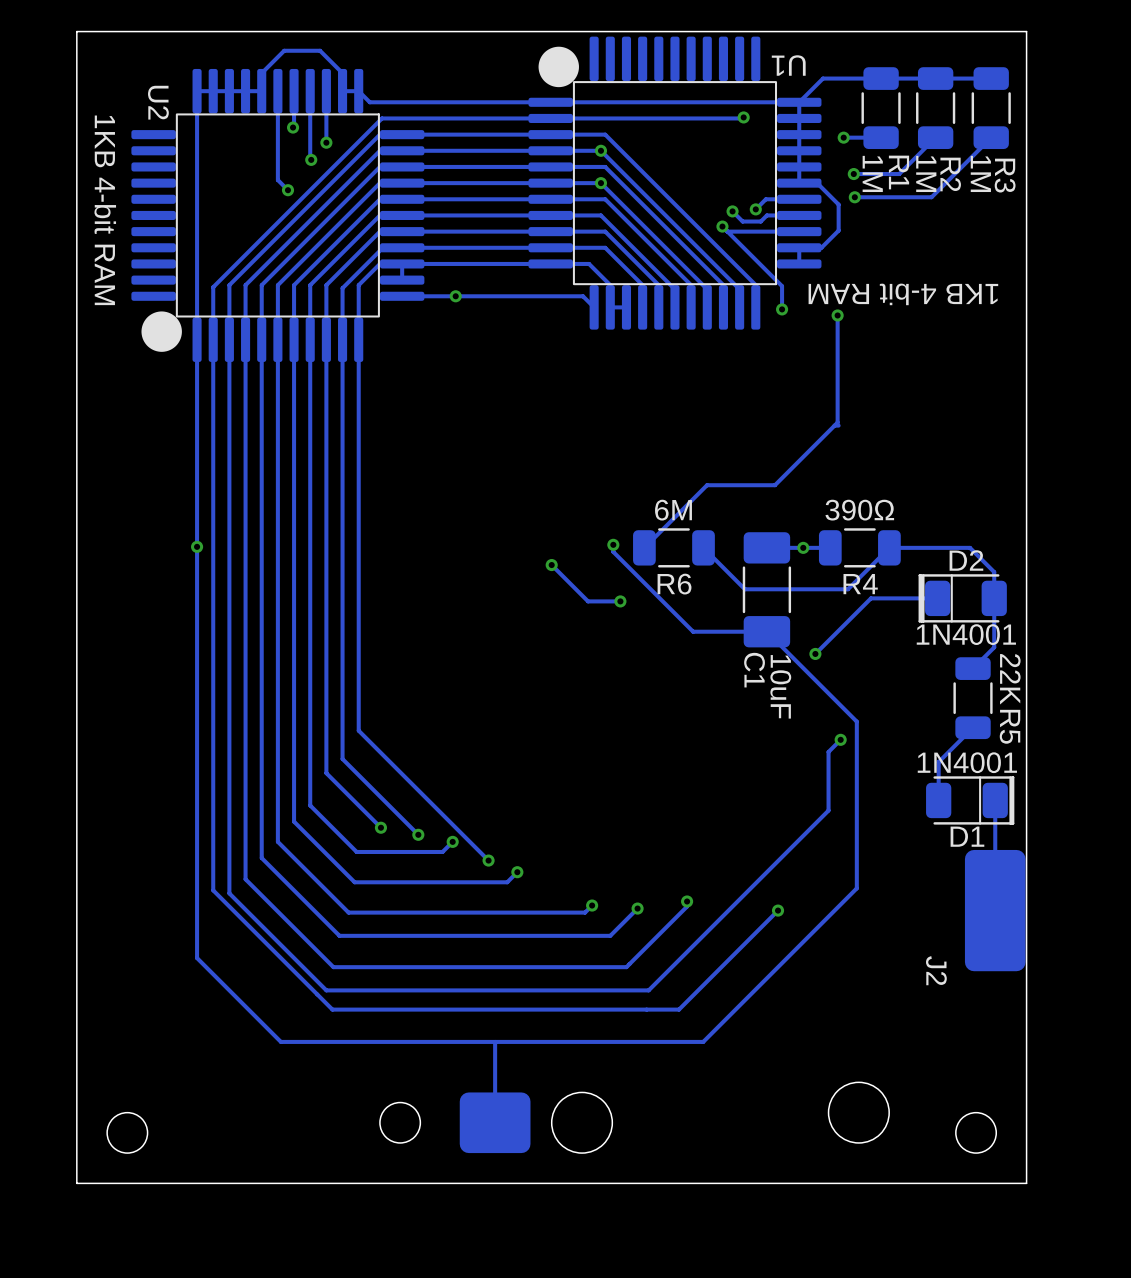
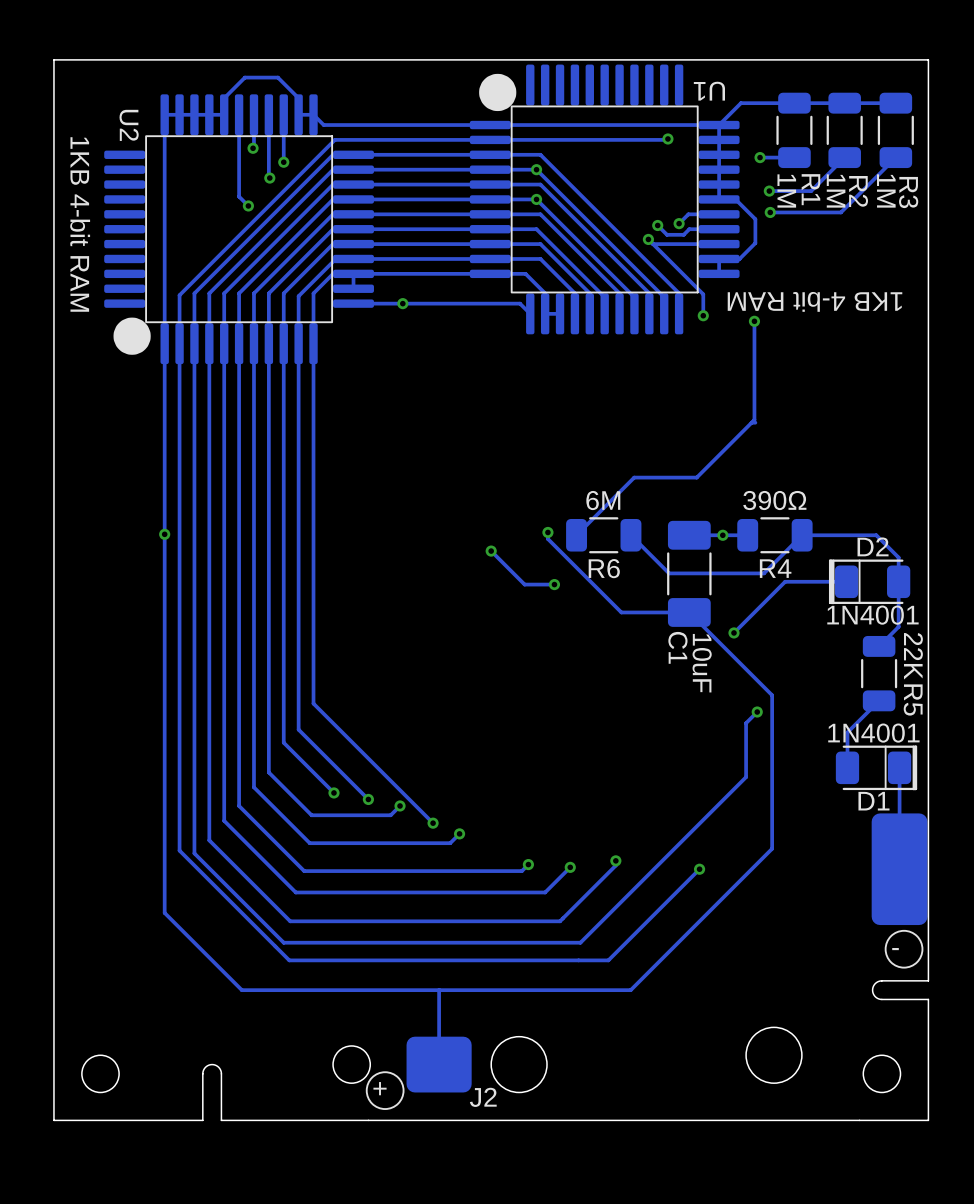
J2 name rotation: 0° (936, 970) -> 90° counterclockwise (483, 1097)
J2 name position: J2 (936, 970) -> J2 (483, 1097)
drawing: none -> [884, 929, 924, 969]
text: none -> - (895, 949)
board edge: (1026, 1031) (1026, 1052) -> (928, 980) (880, 980) (874, 984) (872, 990) (874, 995) (880, 999) (928, 999)
drawing: none -> [365, 1071, 405, 1110]
text: none -> + (380, 1088)
board edge: (258, 1183) (238, 1183) -> (221, 1120) (221, 1072) (217, 1066) (212, 1064) (206, 1066) (202, 1072) (202, 1120)

